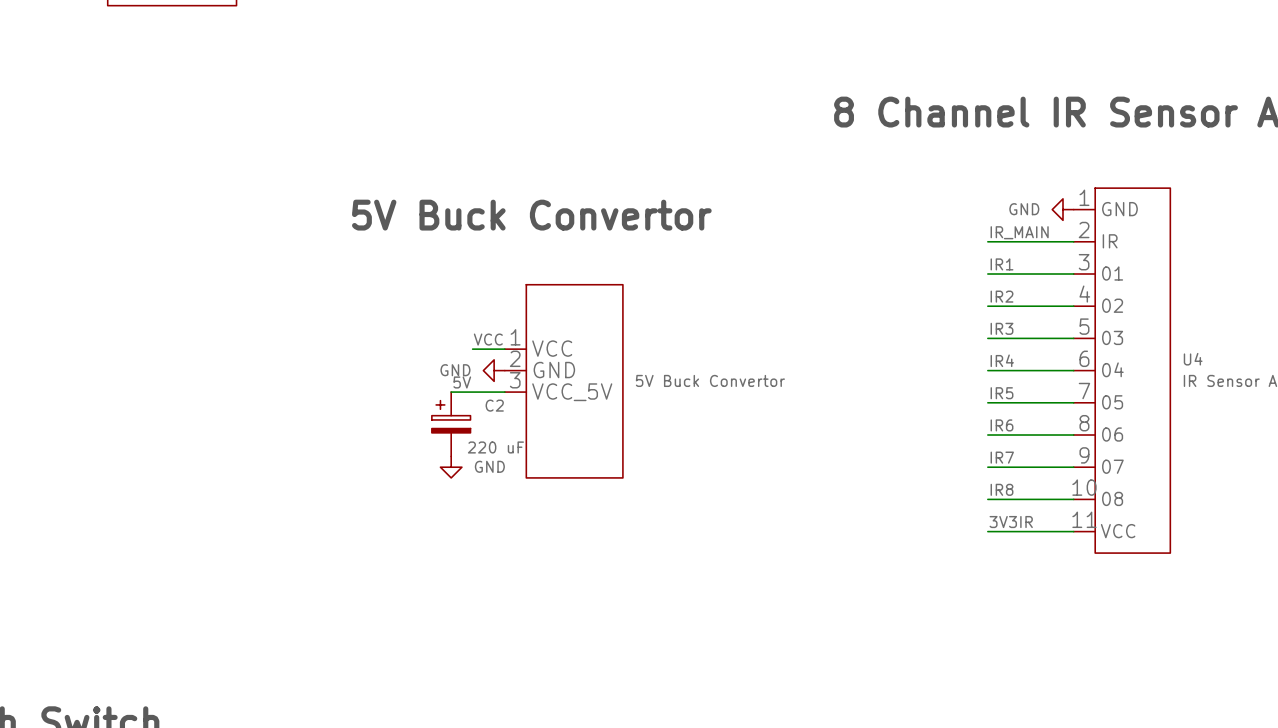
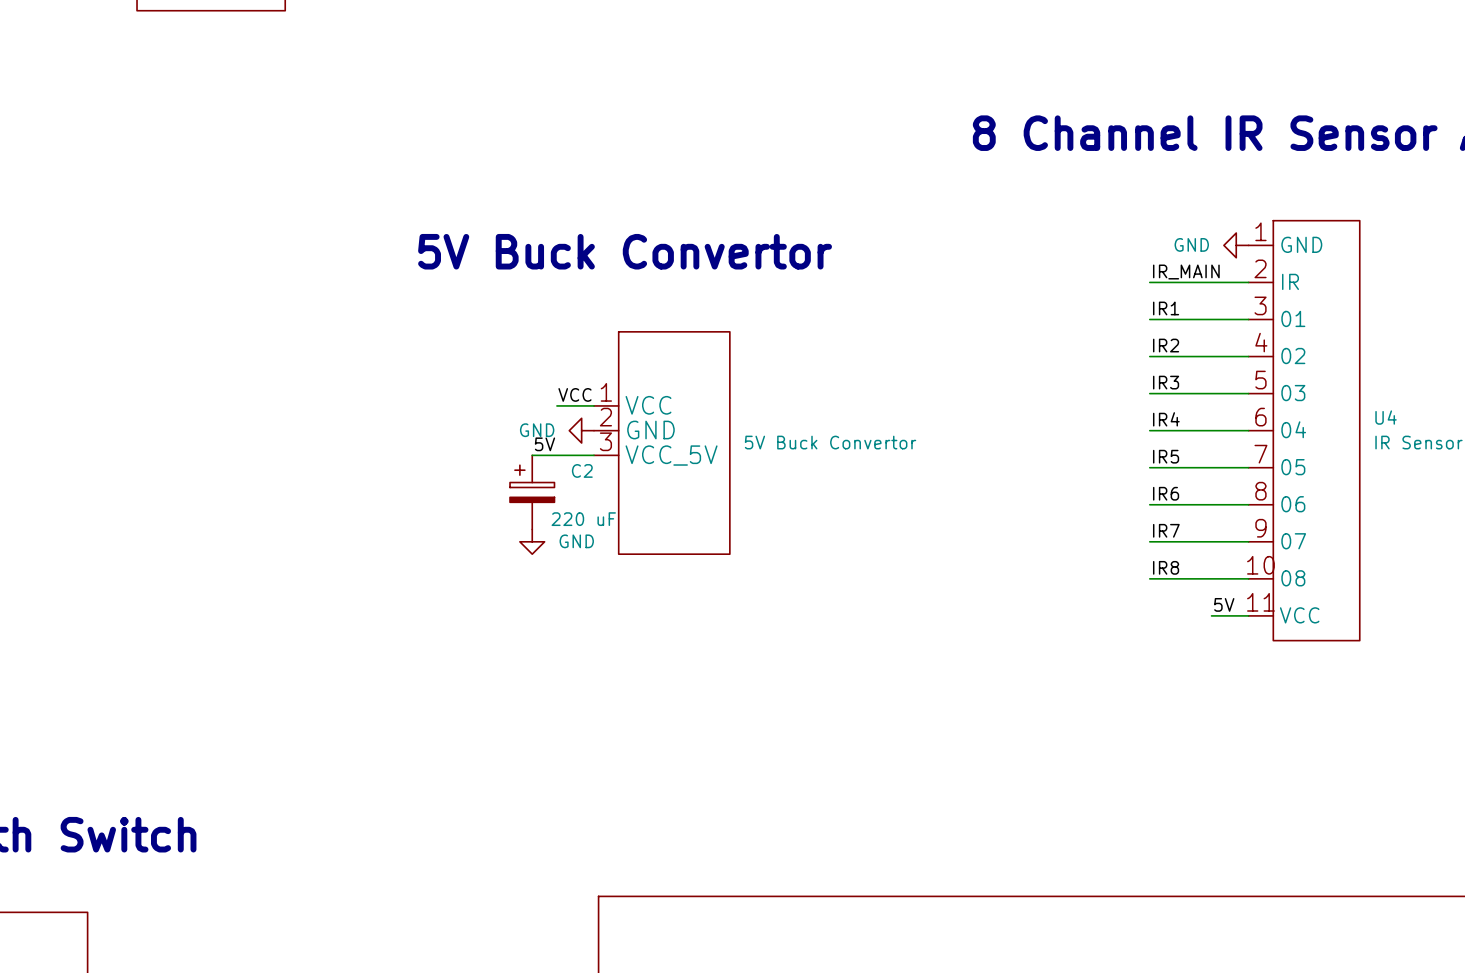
label: 3V3IR (1011, 522) -> none
label: none -> 5V (1224, 604)
wire: (987, 531) (1041, 531) -> none

